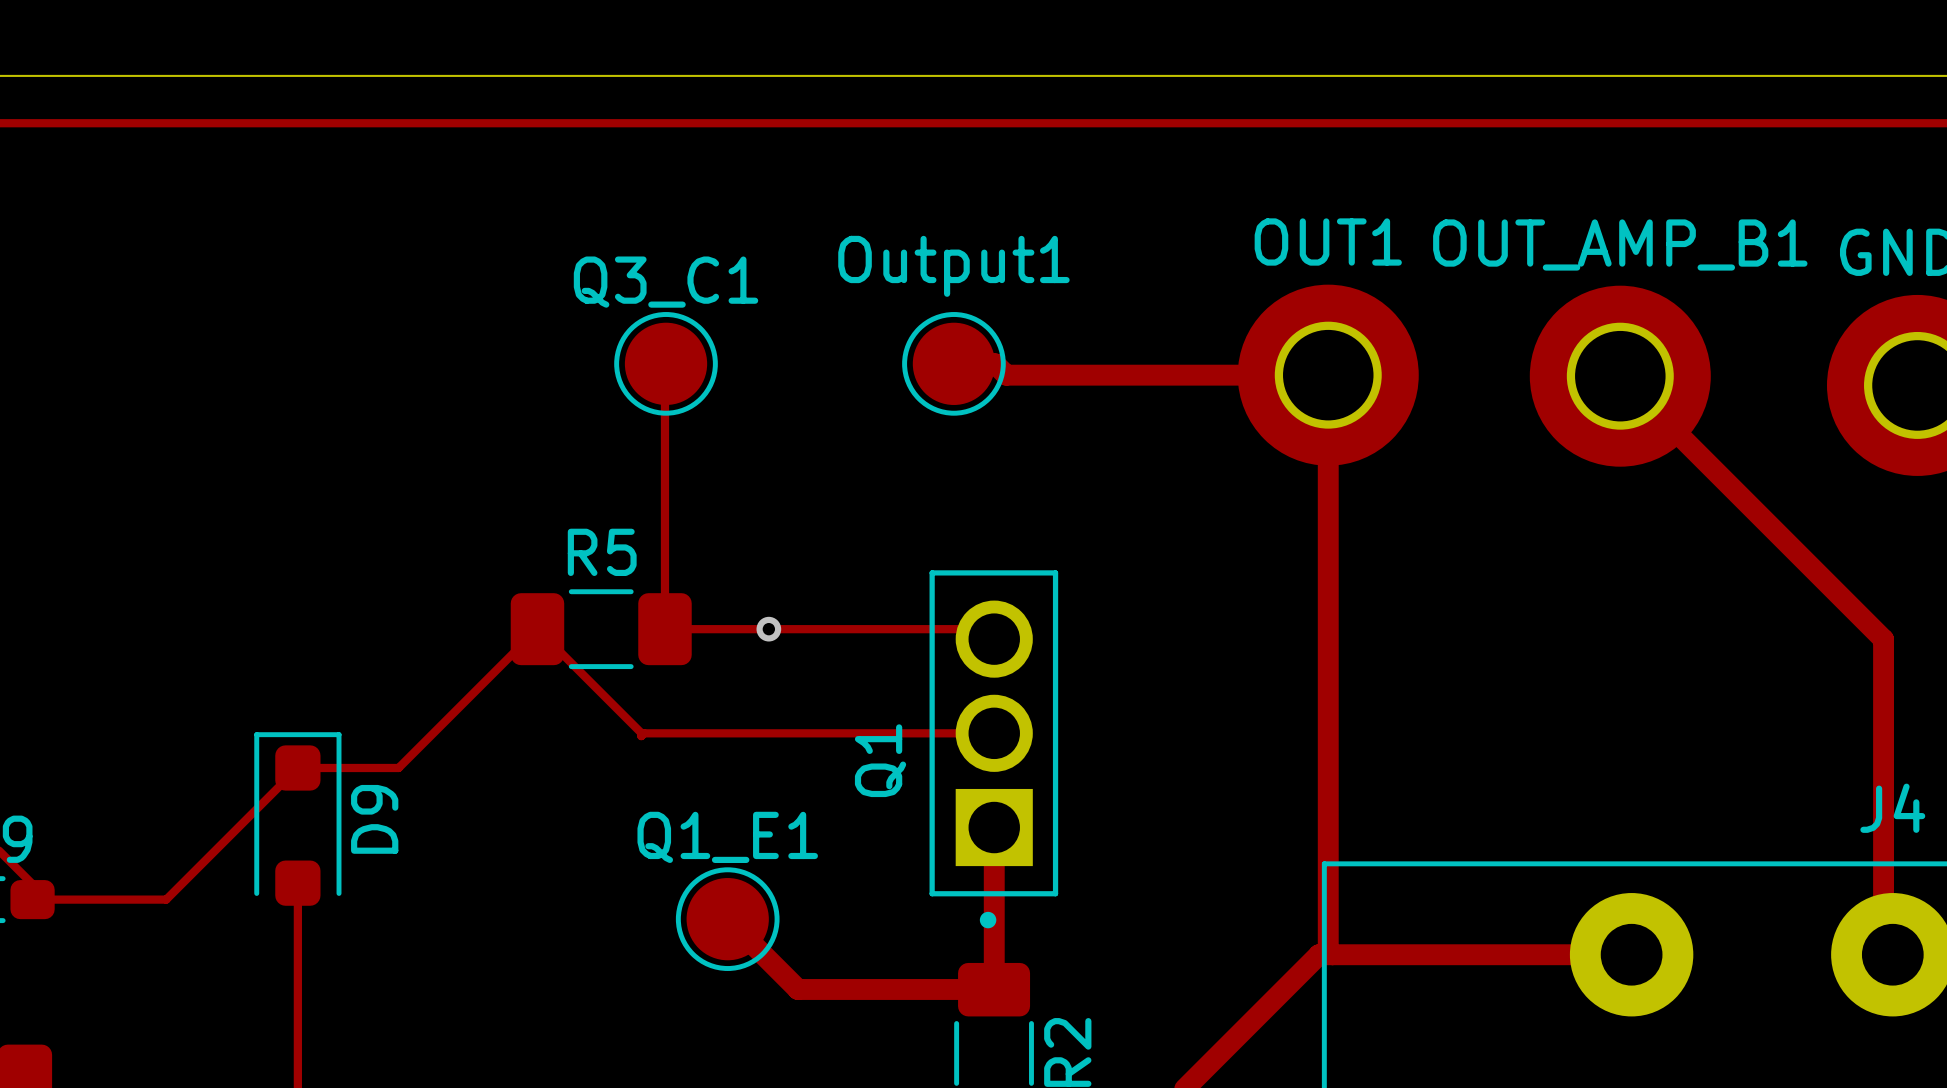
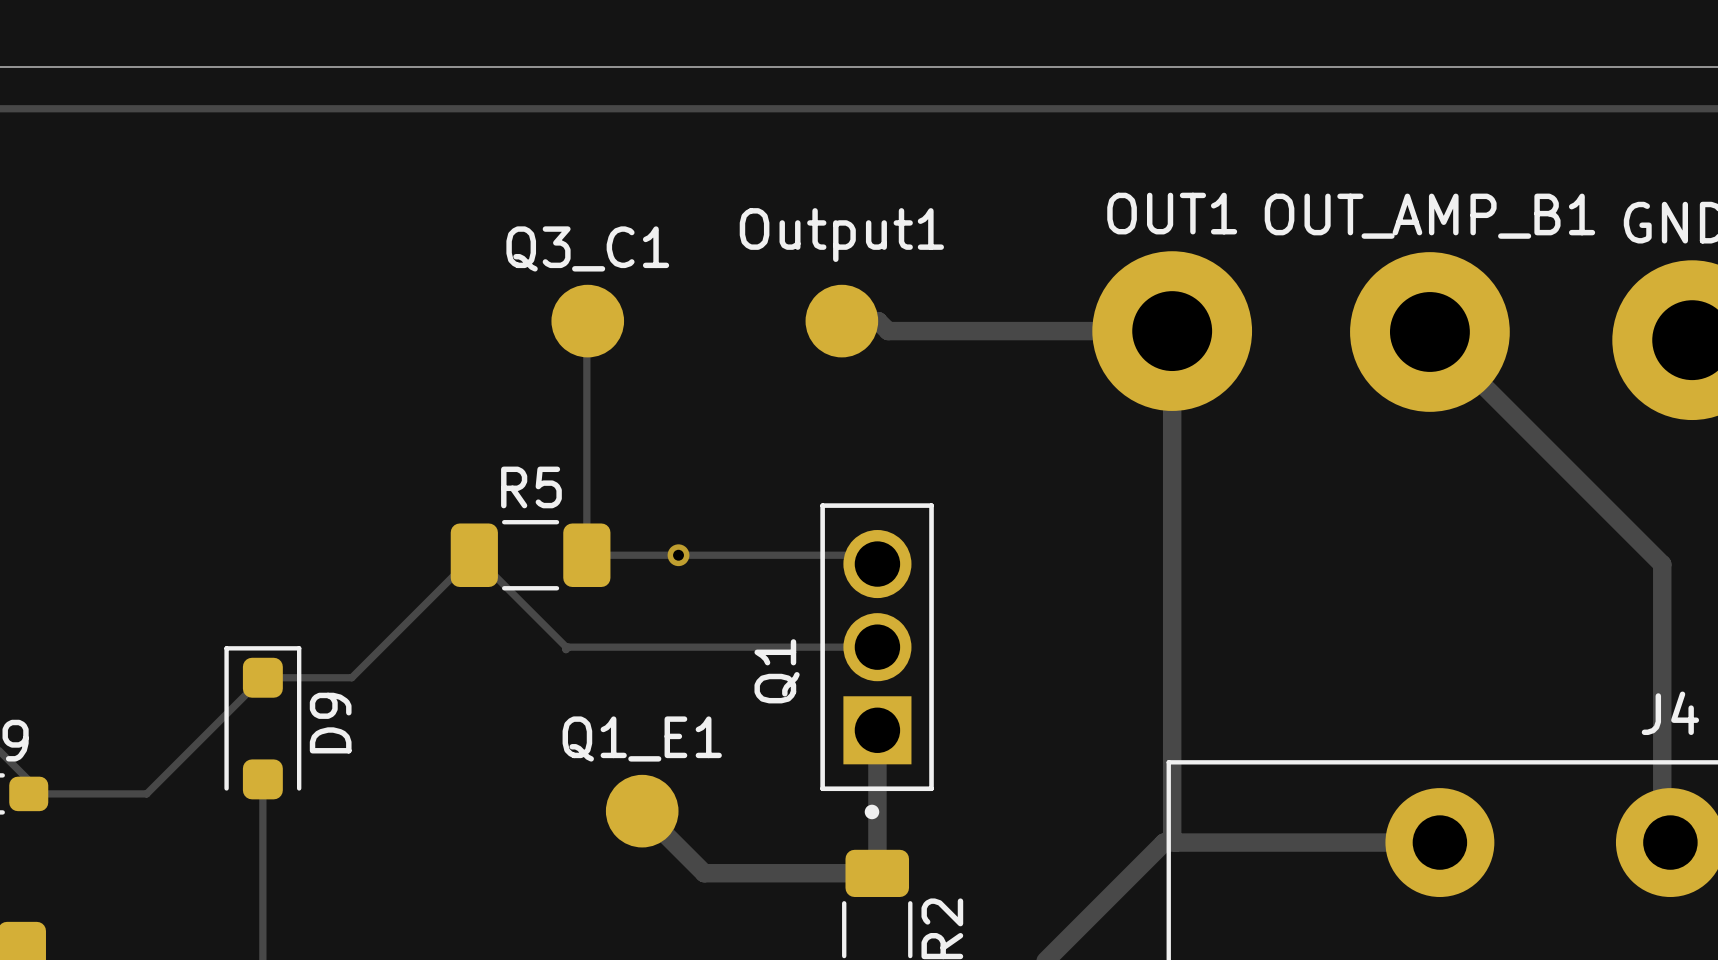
Q3_C1 footprint: [614, 312, 718, 416] -> [551, 284, 625, 358]
Output1 footprint: [902, 312, 1006, 416] -> [805, 284, 879, 358]
Q1_E1 footprint: [675, 867, 780, 971] -> [605, 774, 679, 848]

